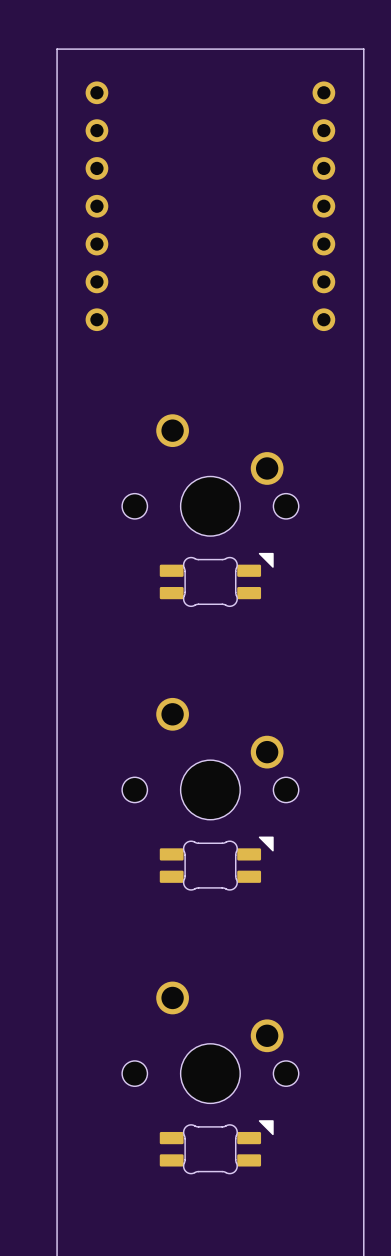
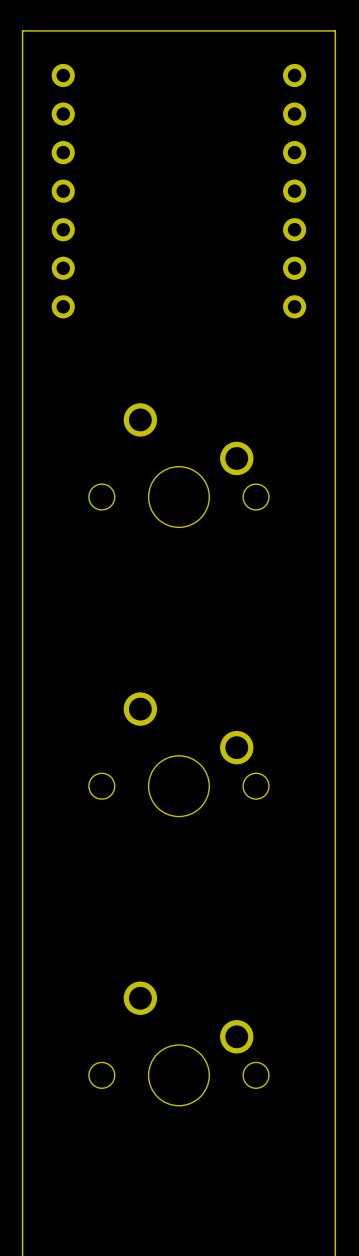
part: (216, 579) -> none
part: (216, 863) -> none
part: (216, 1147) -> none

